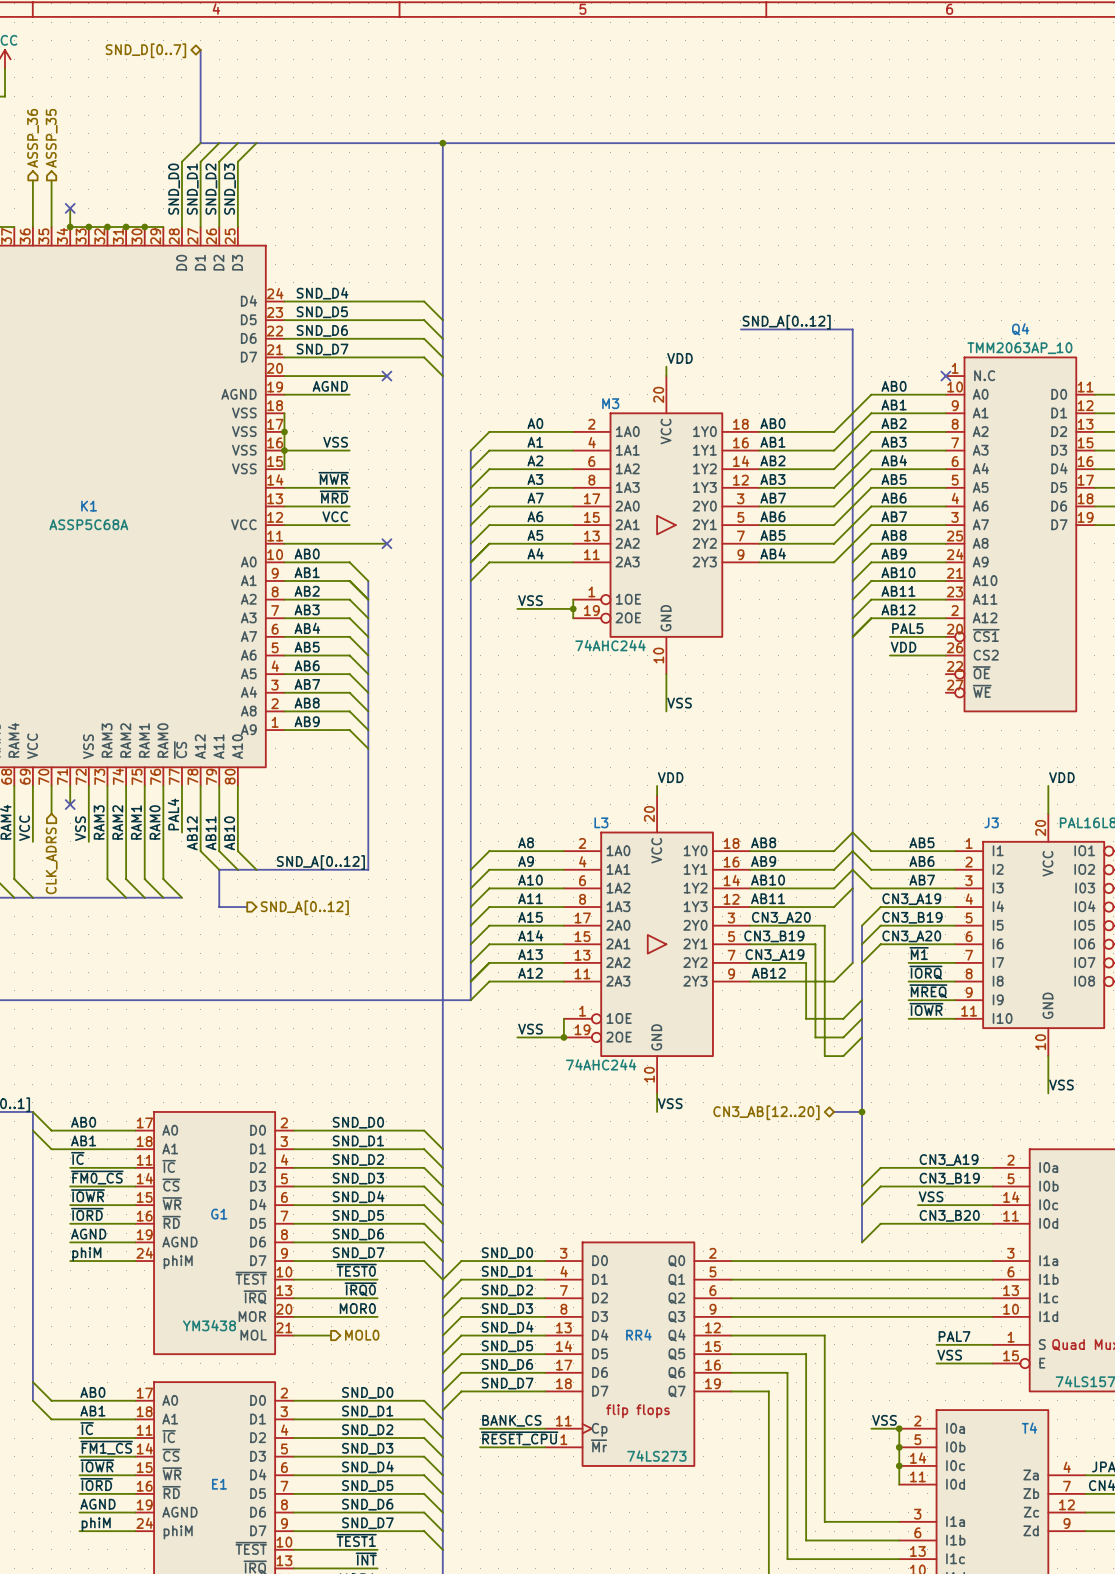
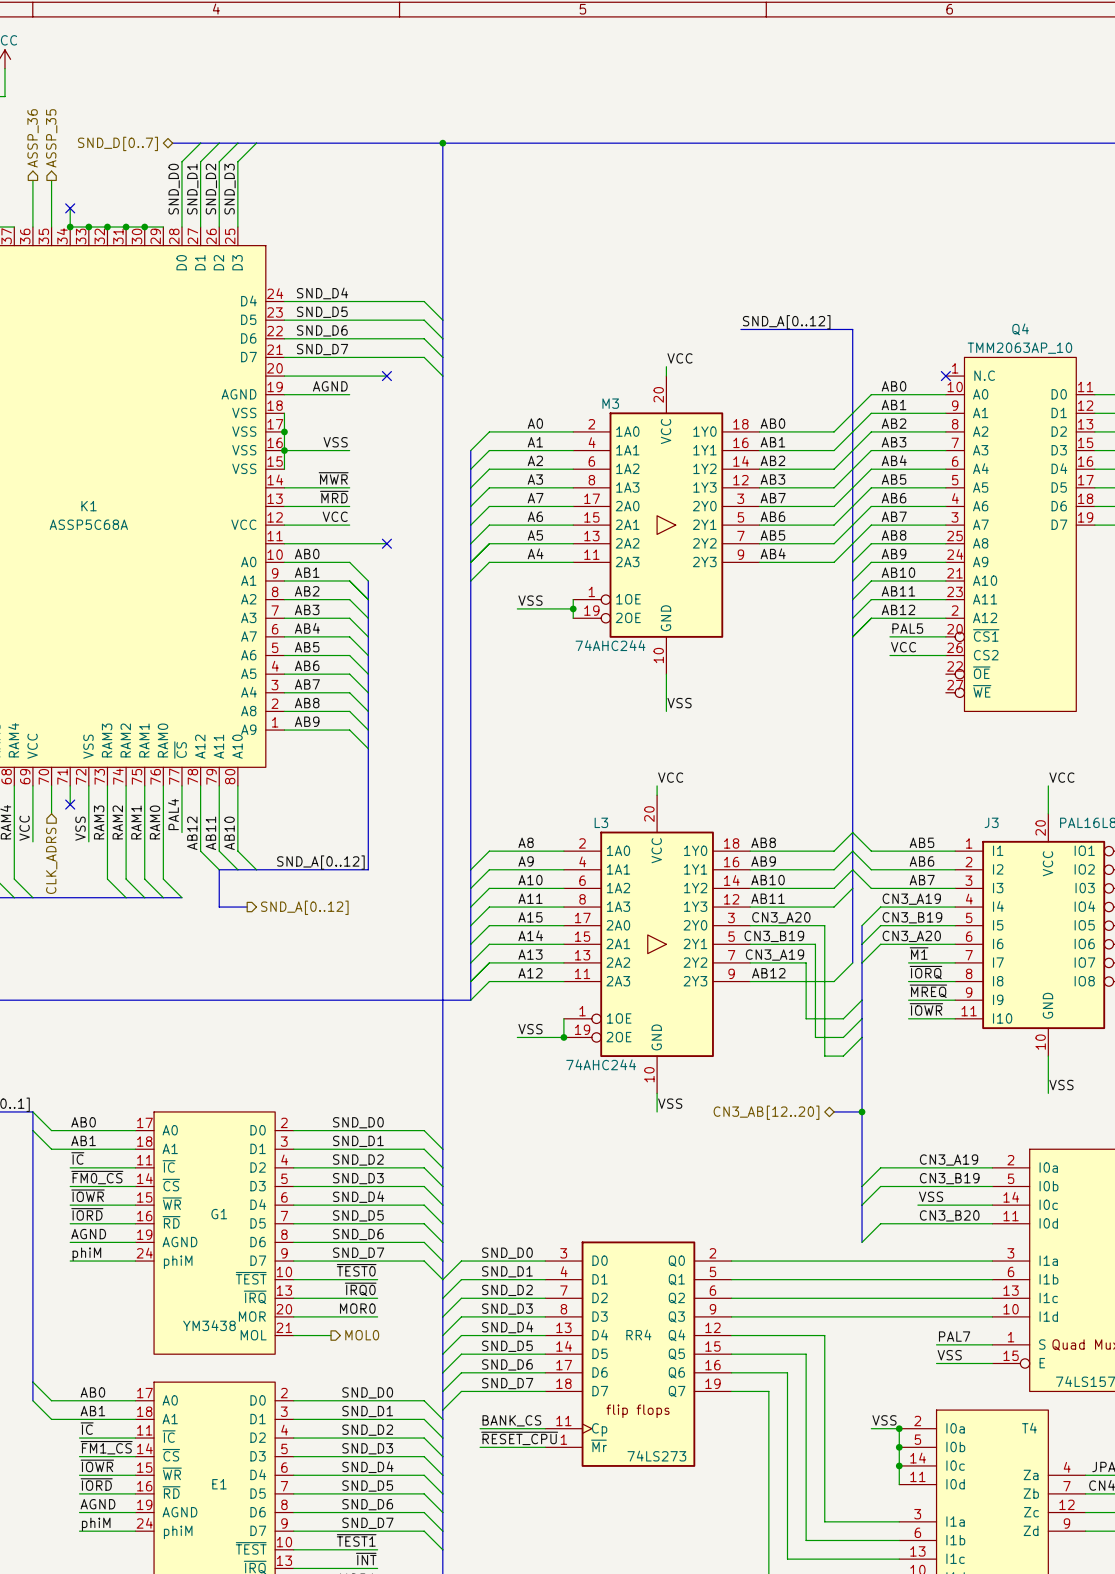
hierarchical label position: SND_D[0..7] (145, 50) -> SND_D[0..7] (117, 143)
bus: (200, 50) (200, 143) -> (172, 143) (200, 143)
label: VDD (679, 358) -> VCC (679, 358)
label: VDD (903, 647) -> VCC (903, 647)
label: VDD (670, 777) -> VCC (670, 777)
label: VDD (1061, 777) -> VCC (1061, 777)

